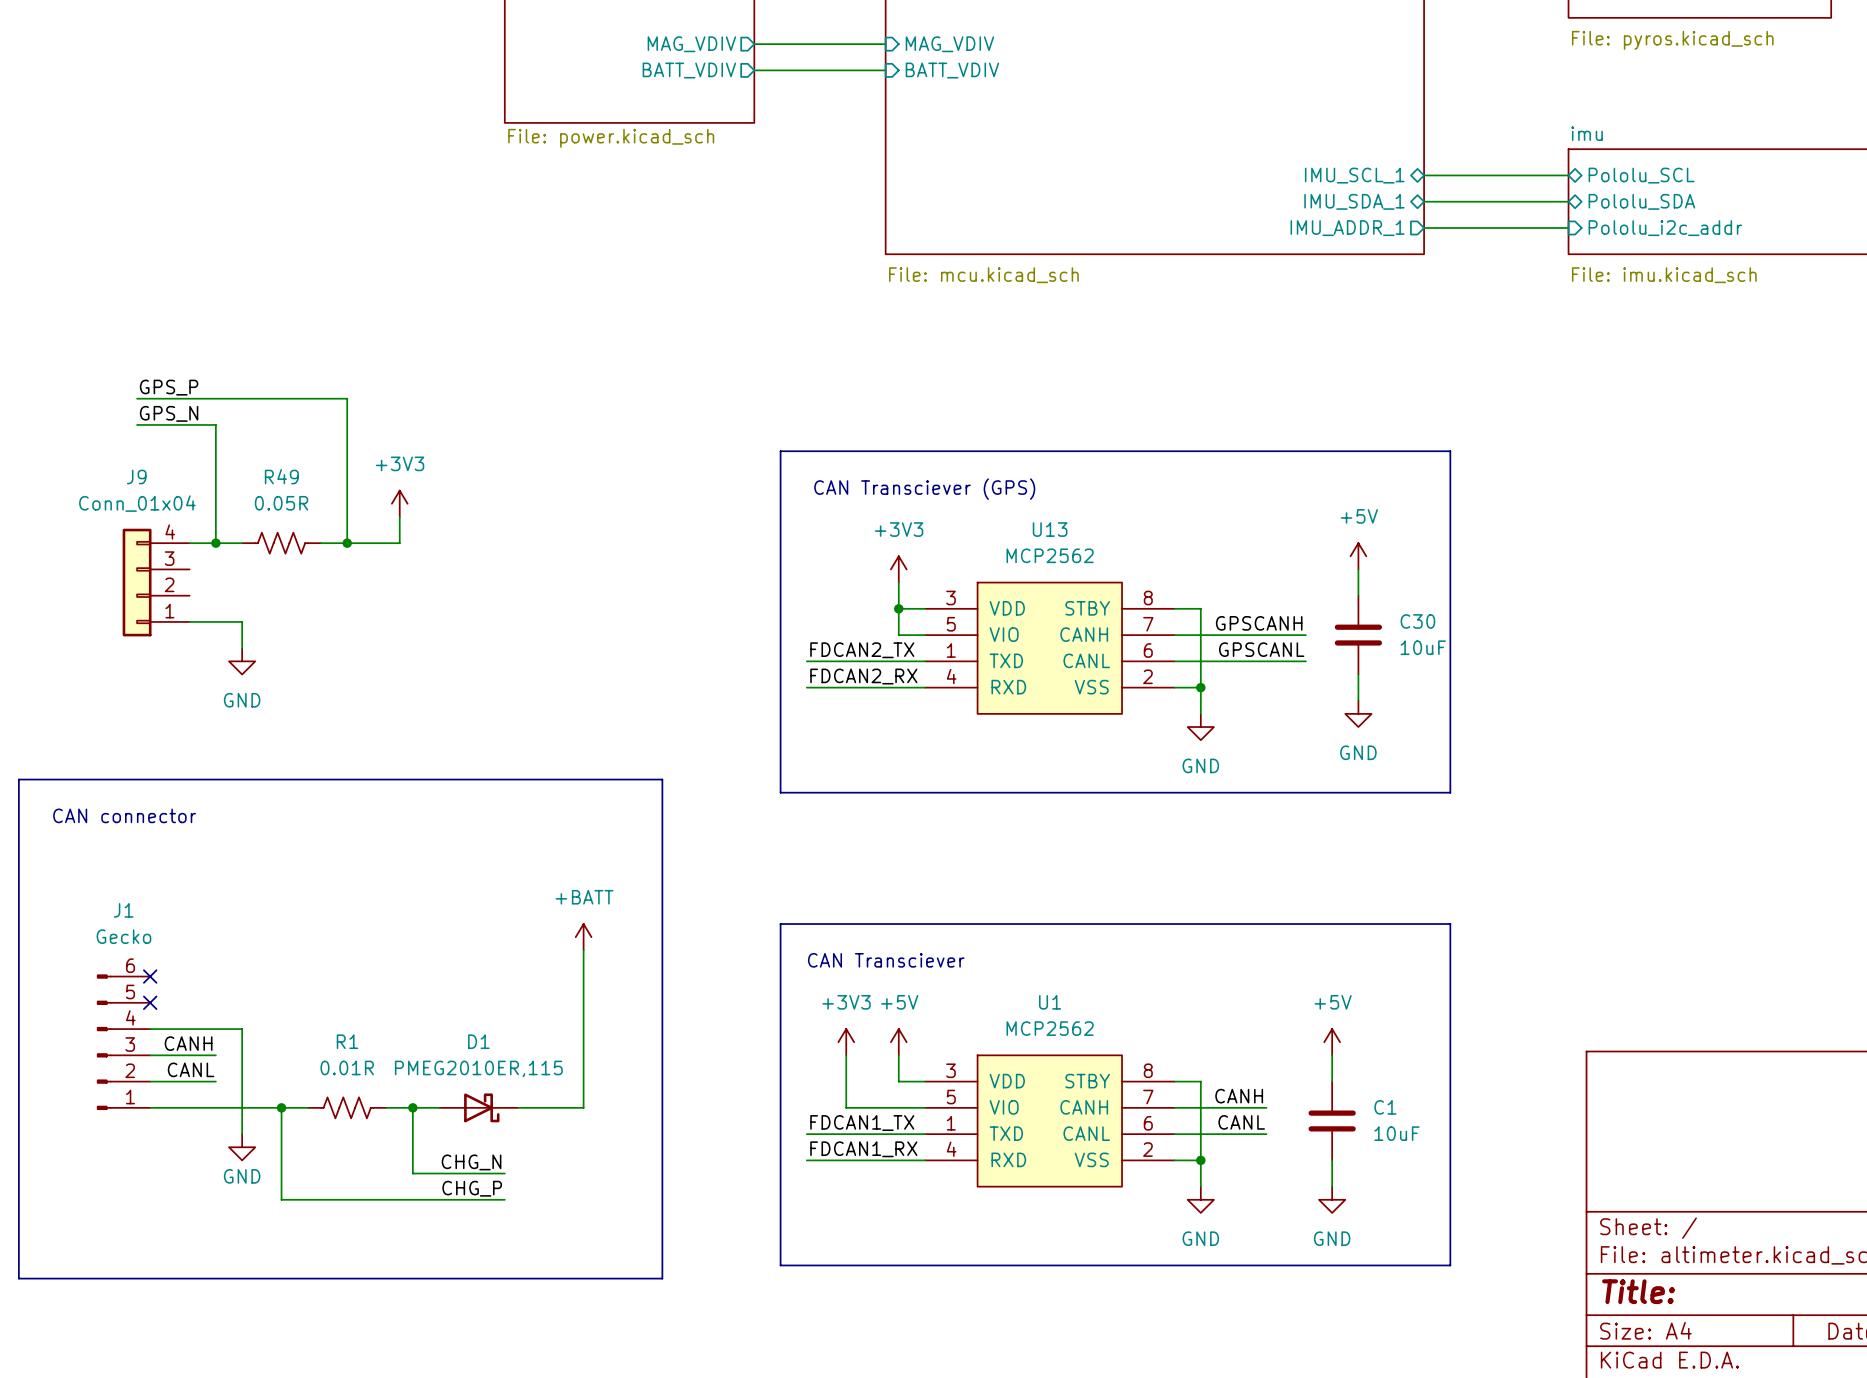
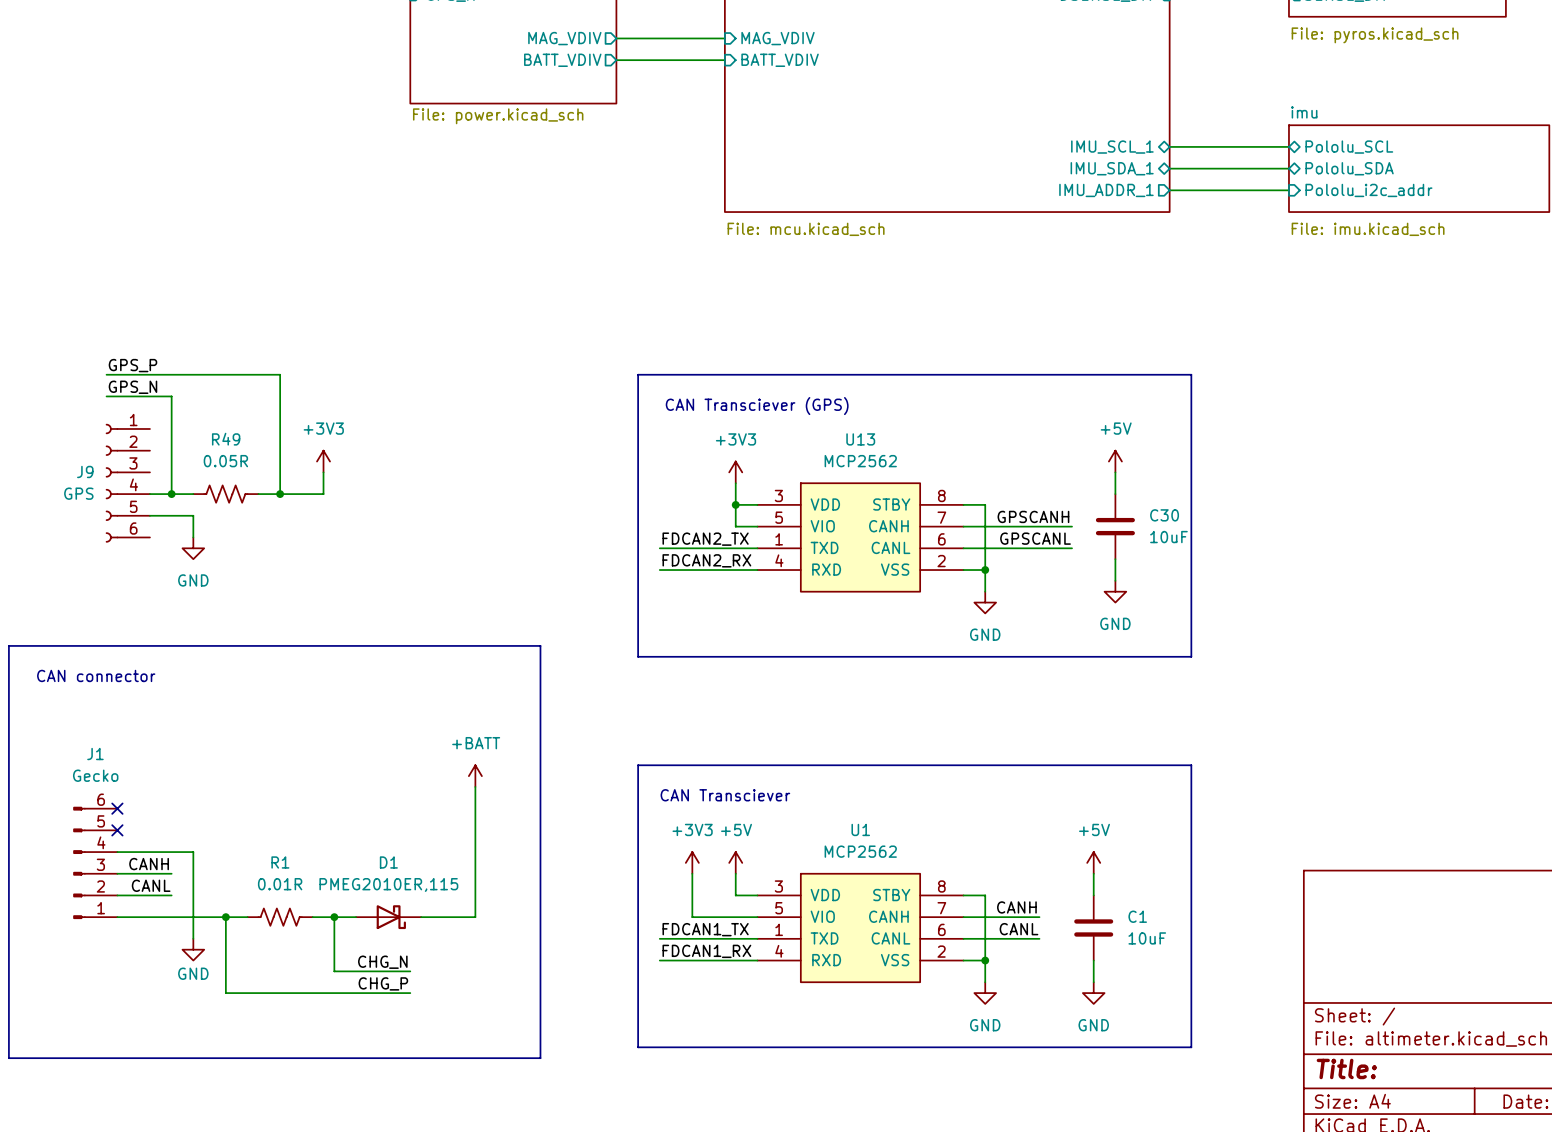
label position: GPS_P (169, 387) -> GPS_P (132, 365)
wire: (137, 398) (347, 398) (347, 451) -> (106, 374) (280, 374)
label position: GPS_N (169, 413) -> GPS_N (132, 387)
wire: (137, 424) (215, 424) (215, 477) -> (106, 396) (171, 396)
J9 name position: J9 (136, 477) -> J9 (85, 471)
J9 value: Conn_01x04 (137, 503) -> GPS (78, 493)
power symbol position: +3V3 (399, 503) -> +3V3 (323, 461)
wire: (399, 516) (399, 543) (320, 543) -> (323, 472) (323, 494) (258, 494)
J9 symbol: [122, 528, 190, 637] -> [105, 424, 150, 543]
wire: (189, 543) (242, 543) -> (149, 494) (193, 494)
wire: none -> (171, 450) (171, 494)
junction position: (215, 543) -> (171, 494)
R49 position: (281, 543) -> (225, 494)
wire: none -> (280, 450) (280, 494)
junction position: (347, 543) -> (280, 494)

